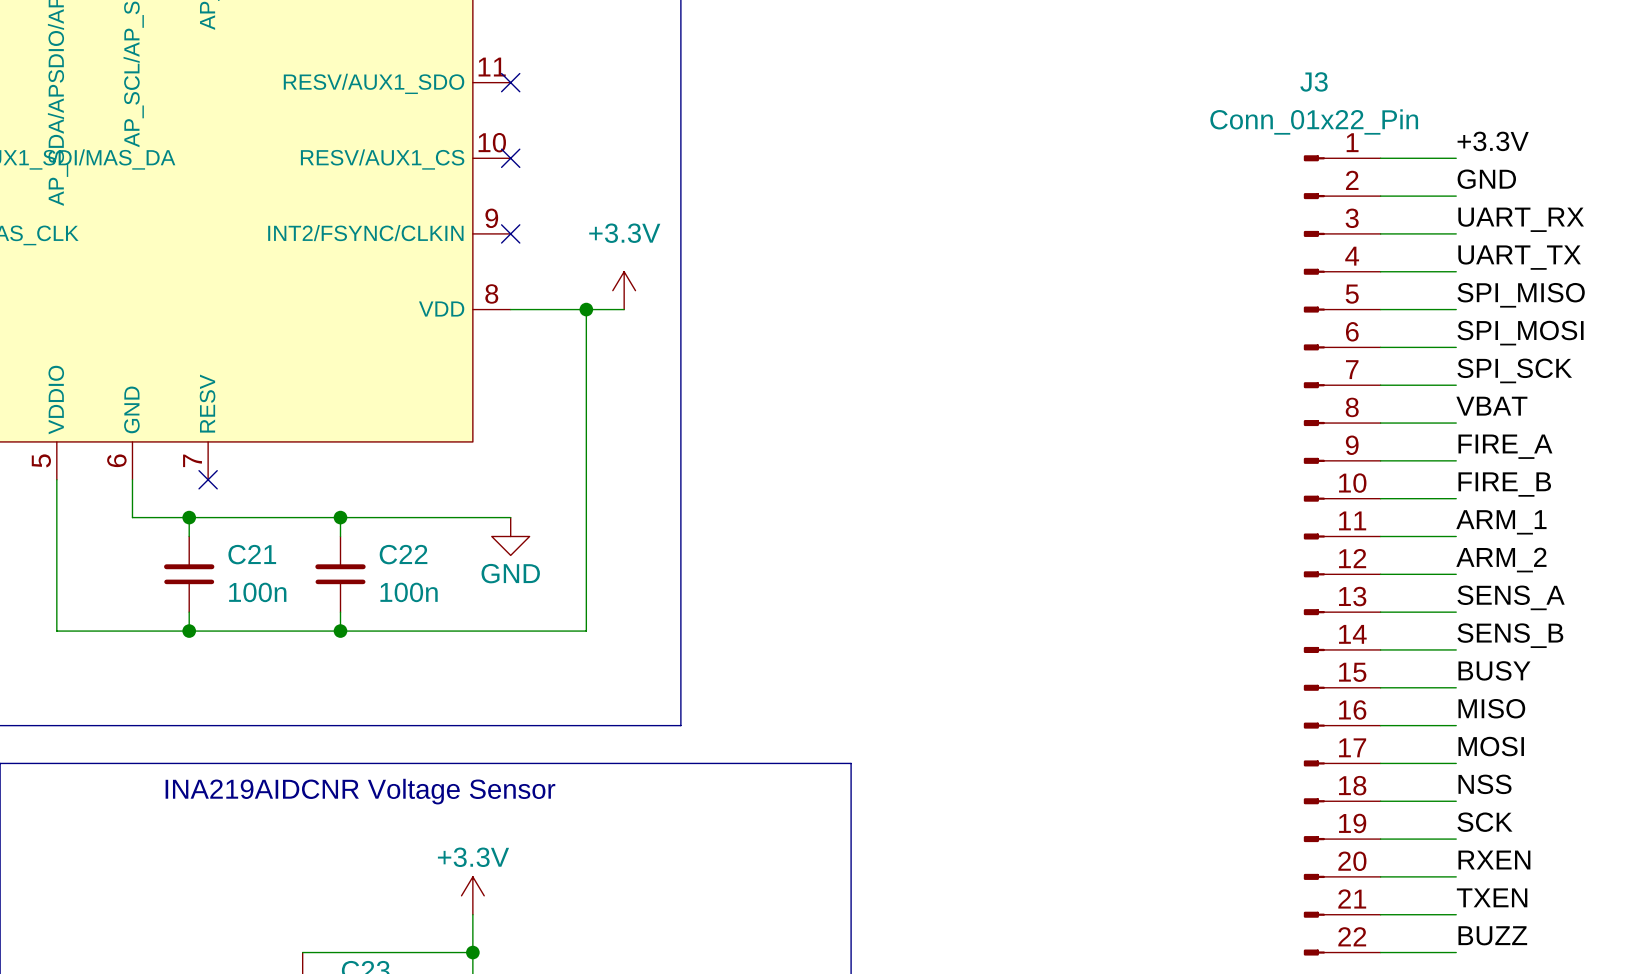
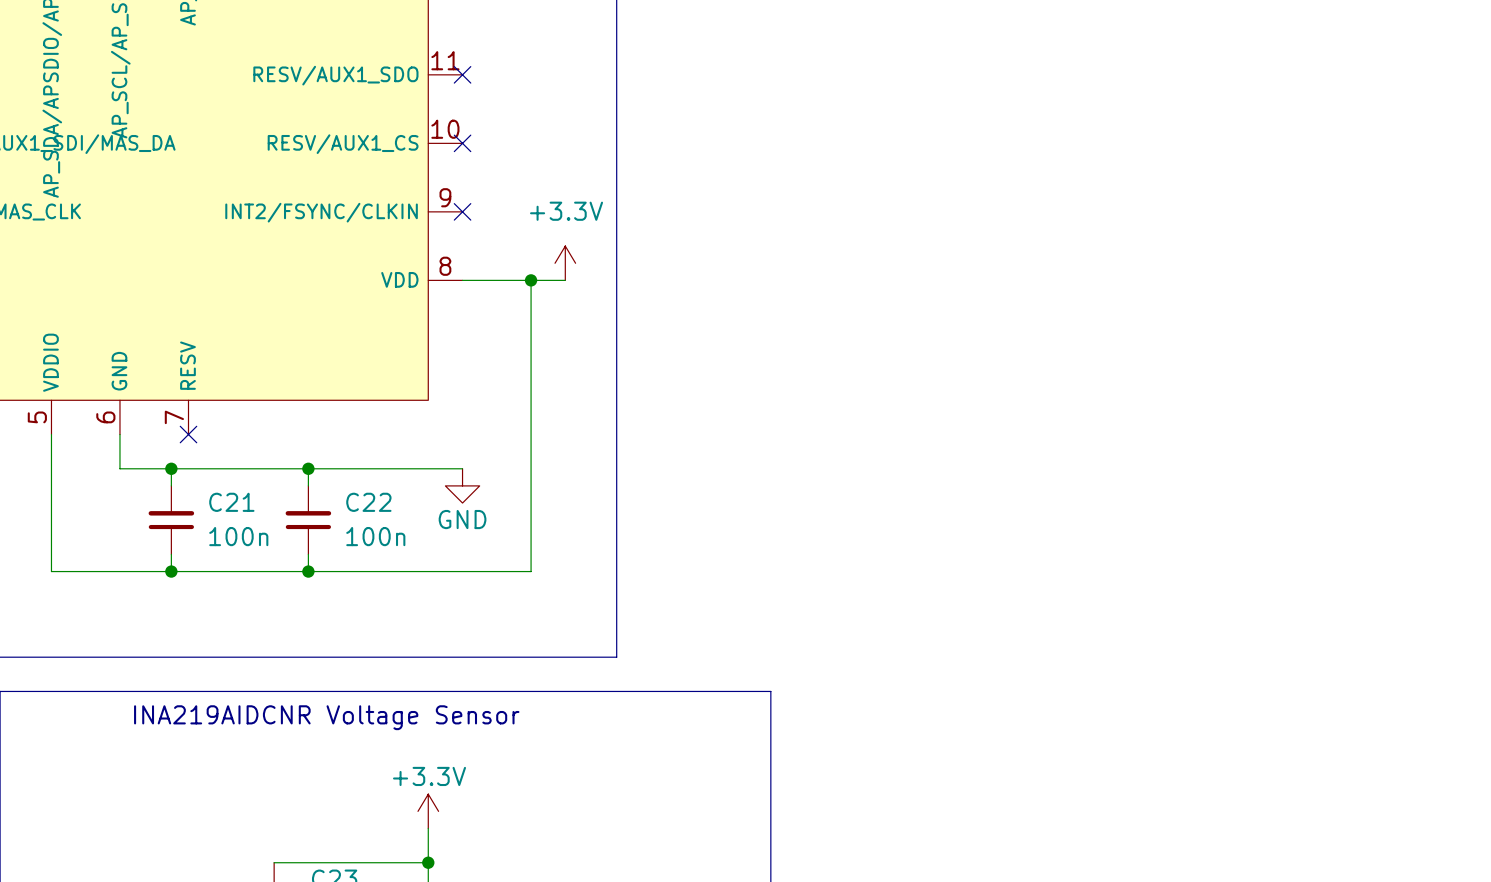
label: +3.3V (1493, 141) -> none
wire: (1380, 158) (1456, 158) -> none
label: GND (1486, 179) -> none
wire: (1380, 196) (1456, 196) -> none
label: UART_RX (1521, 219) -> none
wire: (1380, 233) (1456, 233) -> none
label: UART_TX (1519, 257) -> none
wire: (1380, 271) (1456, 271) -> none
label: SPI_MISO (1521, 295) -> none
wire: (1380, 309) (1456, 309) -> none
label: SPI_MOSI (1520, 333) -> none
wire: (1380, 347) (1456, 347) -> none
label: SPI_SCK (1514, 370) -> none
wire: (1380, 385) (1456, 385) -> none
label: VBAT (1491, 406) -> none
wire: (1380, 423) (1456, 423) -> none
label: FIRE_A (1505, 446) -> none
wire: (1380, 460) (1456, 460) -> none
label: FIRE_B (1504, 484) -> none
wire: (1380, 498) (1456, 498) -> none
label: ARM_1 (1501, 522) -> none
wire: (1380, 536) (1456, 536) -> none
J3: Conn_01x22_Pin (1342, 555) -> none
label: ARM_2 (1501, 560) -> none
wire: (1380, 574) (1456, 574) -> none
label: SENS_A (1511, 597) -> none
wire: (1380, 612) (1456, 612) -> none
label: SENS_B (1510, 635) -> none
wire: (1380, 649) (1456, 649) -> none
label: BUSY (1494, 670) -> none
wire: (1380, 687) (1456, 687) -> none
label: MISO (1491, 708) -> none
wire: (1380, 725) (1456, 725) -> none
label: MOSI (1491, 746) -> none
wire: (1380, 763) (1456, 763) -> none
label: NSS (1484, 784) -> none
wire: (1380, 801) (1456, 801) -> none
label: SCK (1484, 822) -> none
wire: (1380, 839) (1456, 839) -> none
label: RXEN (1494, 860) -> none
wire: (1380, 876) (1456, 876) -> none
label: TXEN (1492, 897) -> none
wire: (1380, 914) (1456, 914) -> none
label: BUZZ (1492, 935) -> none
wire: (1380, 952) (1456, 952) -> none

